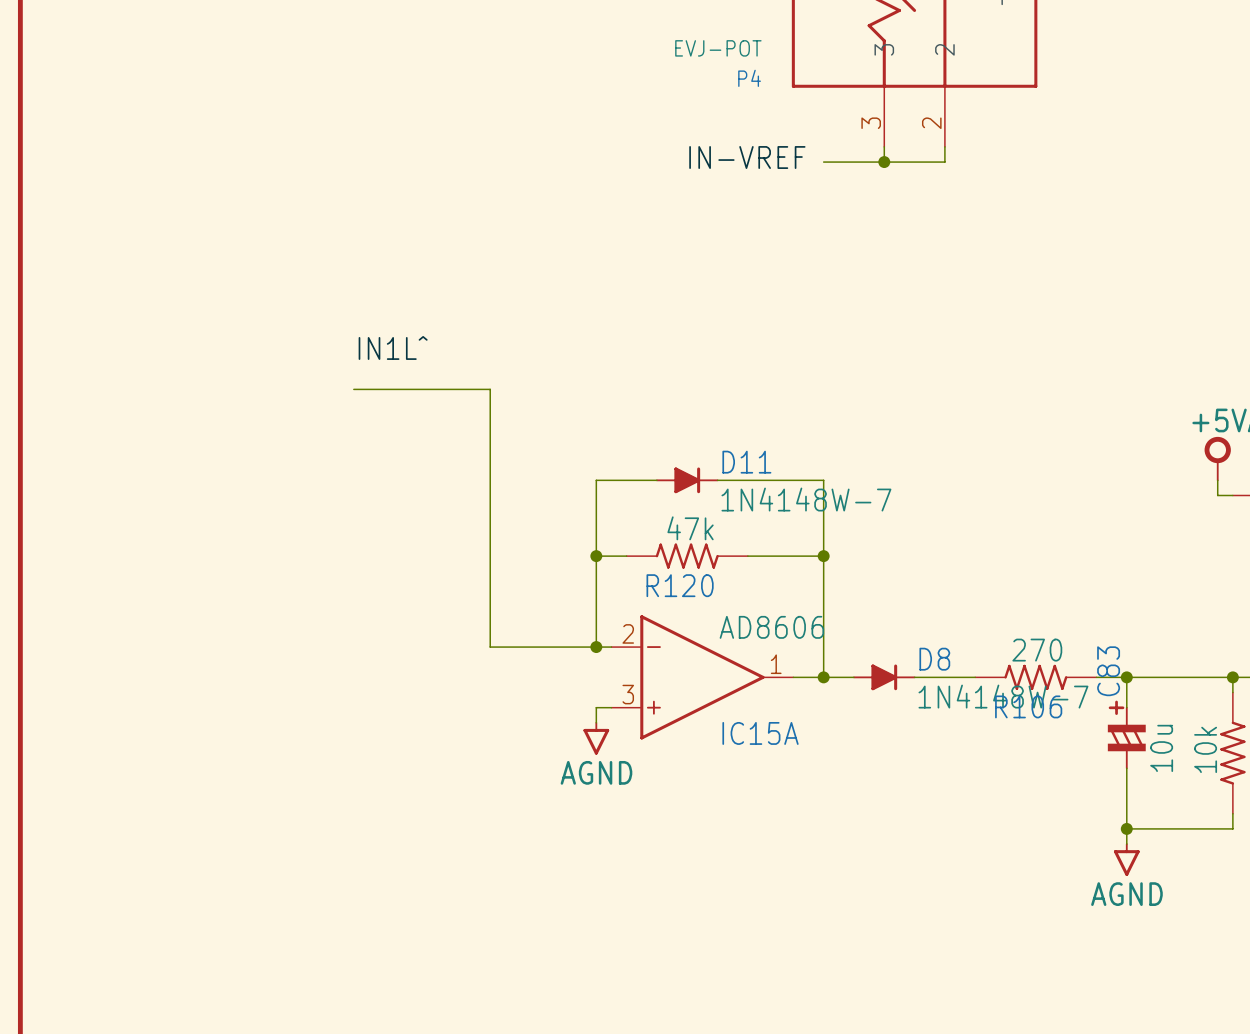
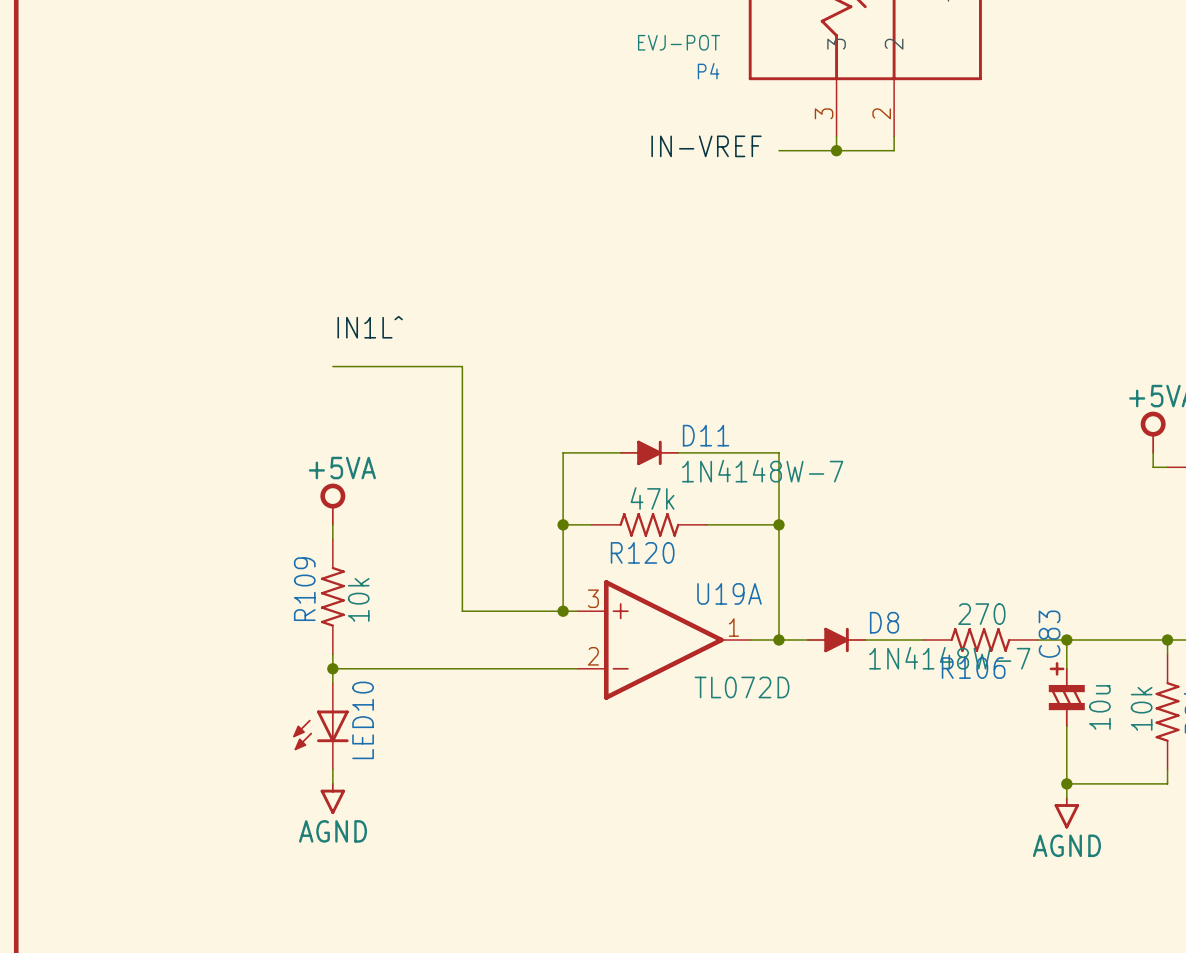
power symbol: none -> +5VA (332, 504)
wire: none -> (332, 524) (332, 539)
R109: none -> 10k (332, 596)
IC15A: AD8606 (702, 677) -> none
U19A: none -> TL072D (663, 639)
wire: none -> (332, 654) (332, 683)
junction: none -> (332, 668)
wire: (596, 707) (596, 722) -> (563, 668) (332, 668)
power symbol position: AGND (596, 738) -> AGND (332, 798)
LED10: none -> (320, 726)
wire: none -> (332, 769) (332, 783)

